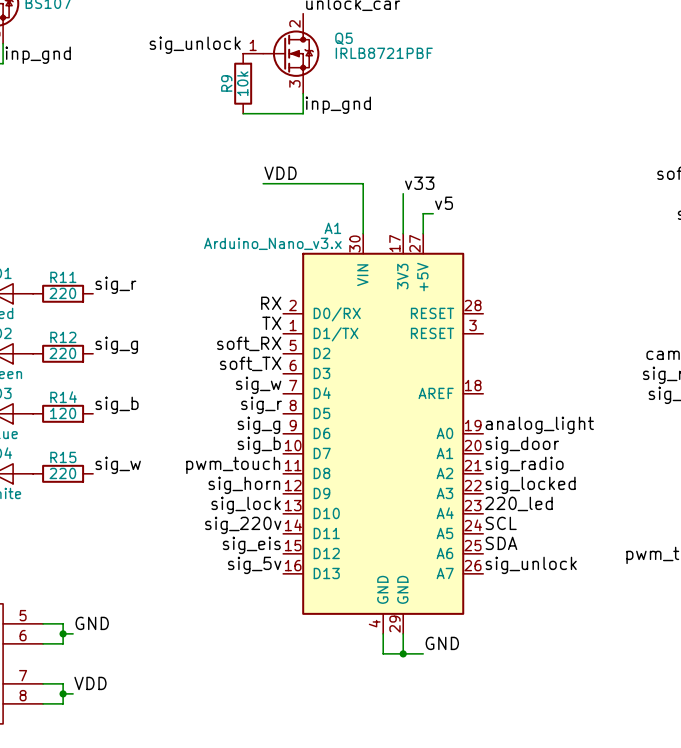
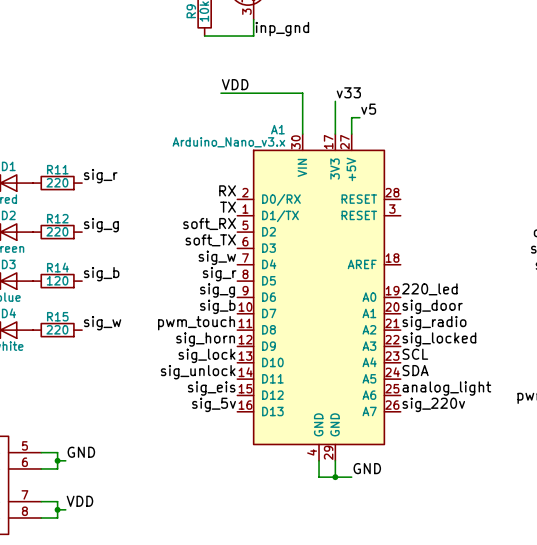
label: analog_light (539, 425) -> 220_led (429, 289)
label: 220_led (518, 503) -> SCL (415, 354)
label: SCL (501, 523) -> SDA (415, 370)
label: sig_220v (243, 525) -> sig_unlock (198, 372)
label: SDA (501, 543) -> analog_light (446, 388)
label: sig_unlock (531, 565) -> sig_220v (433, 404)

